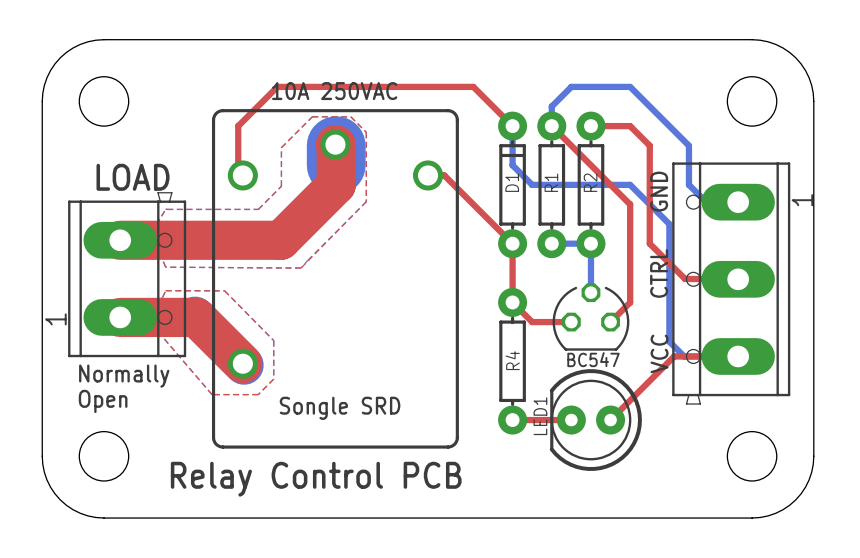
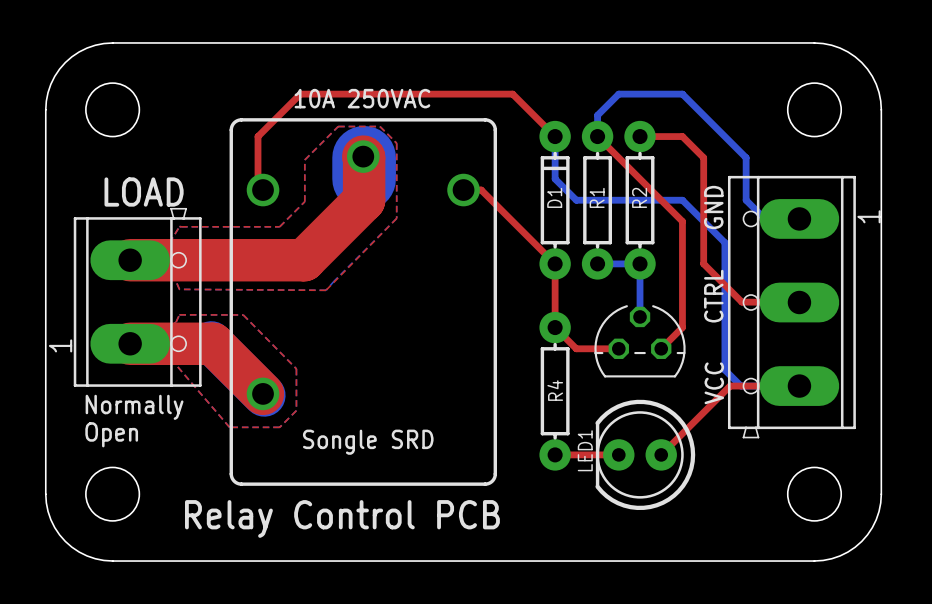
part footprint: [552, 283, 630, 351] -> [594, 305, 686, 378]
text: BC547 (593, 359) -> none

